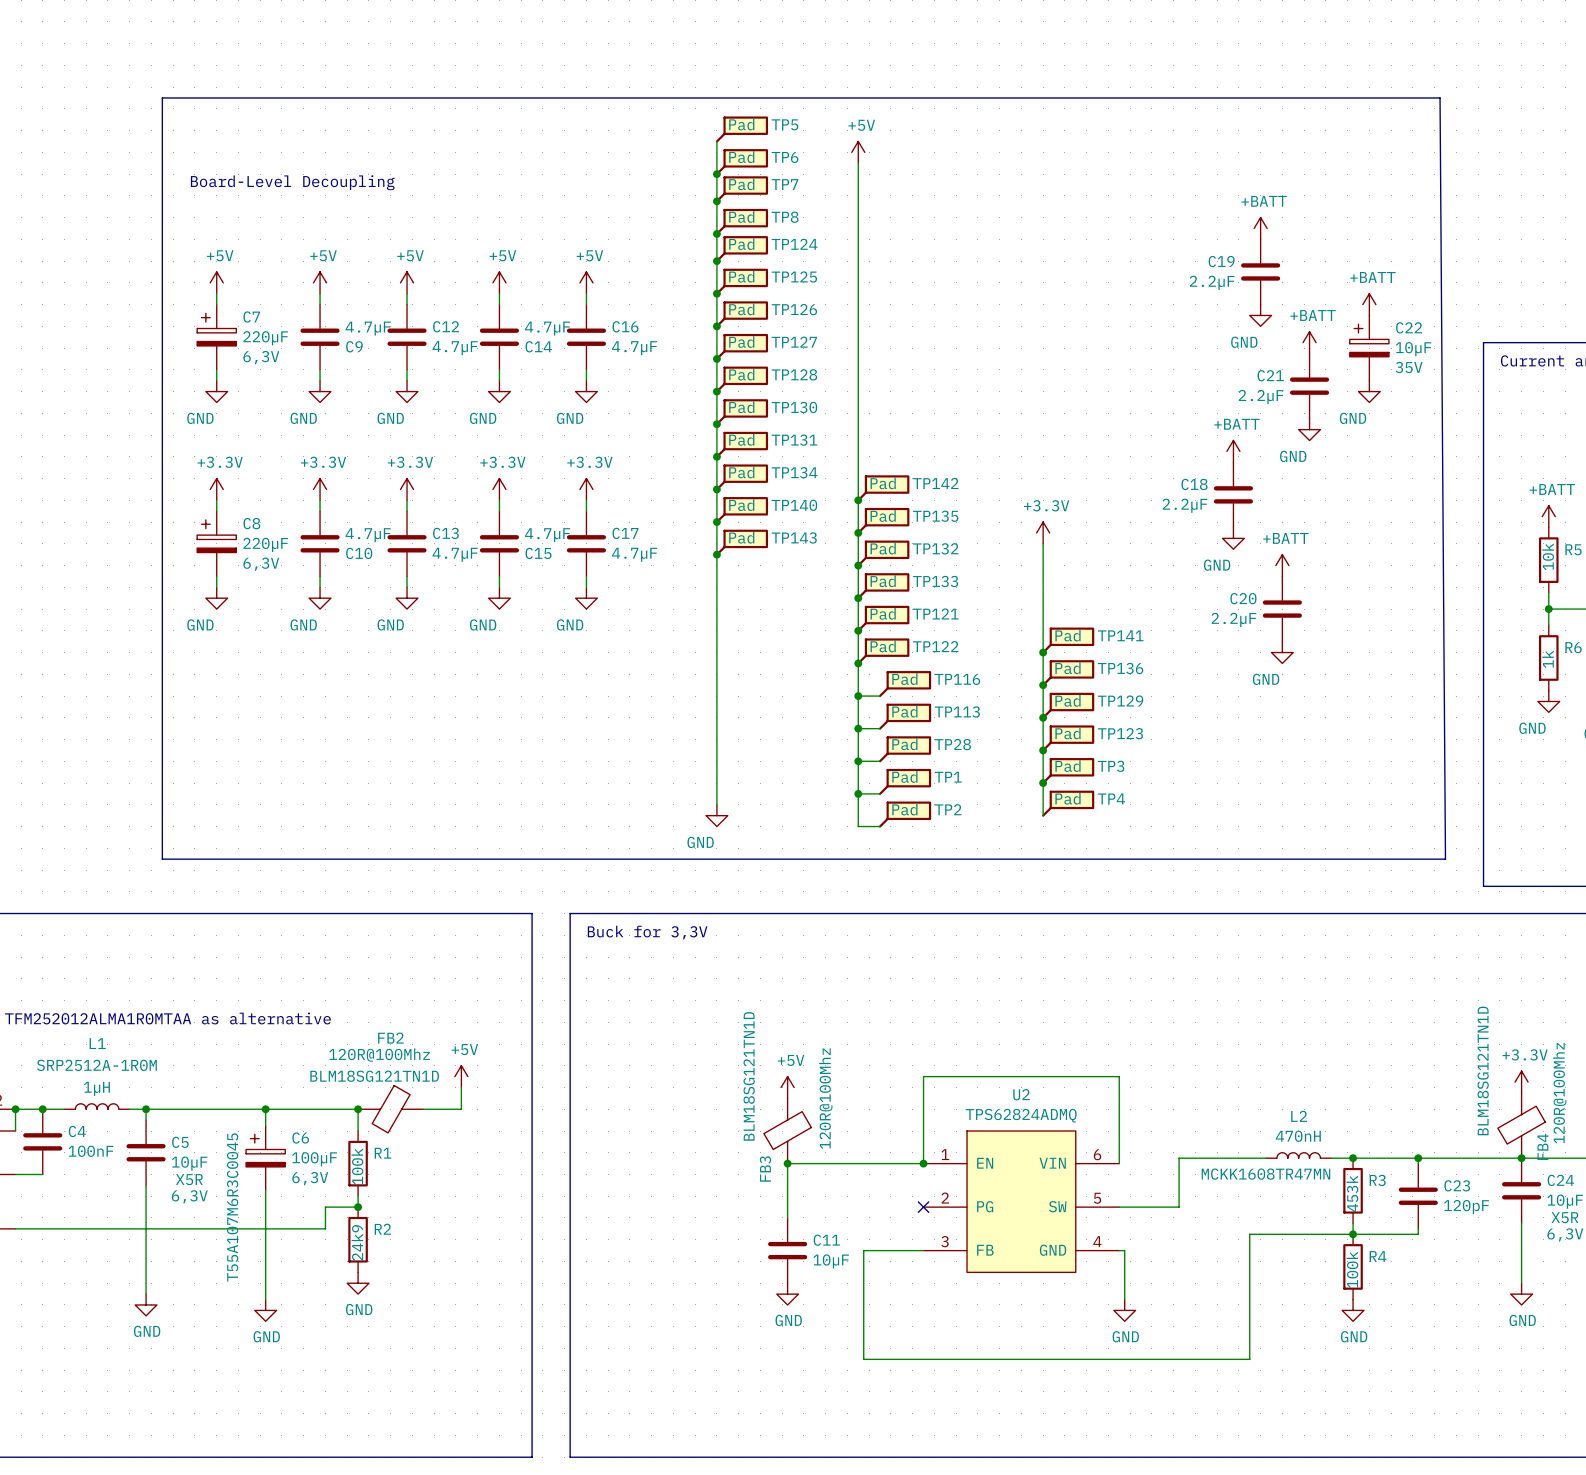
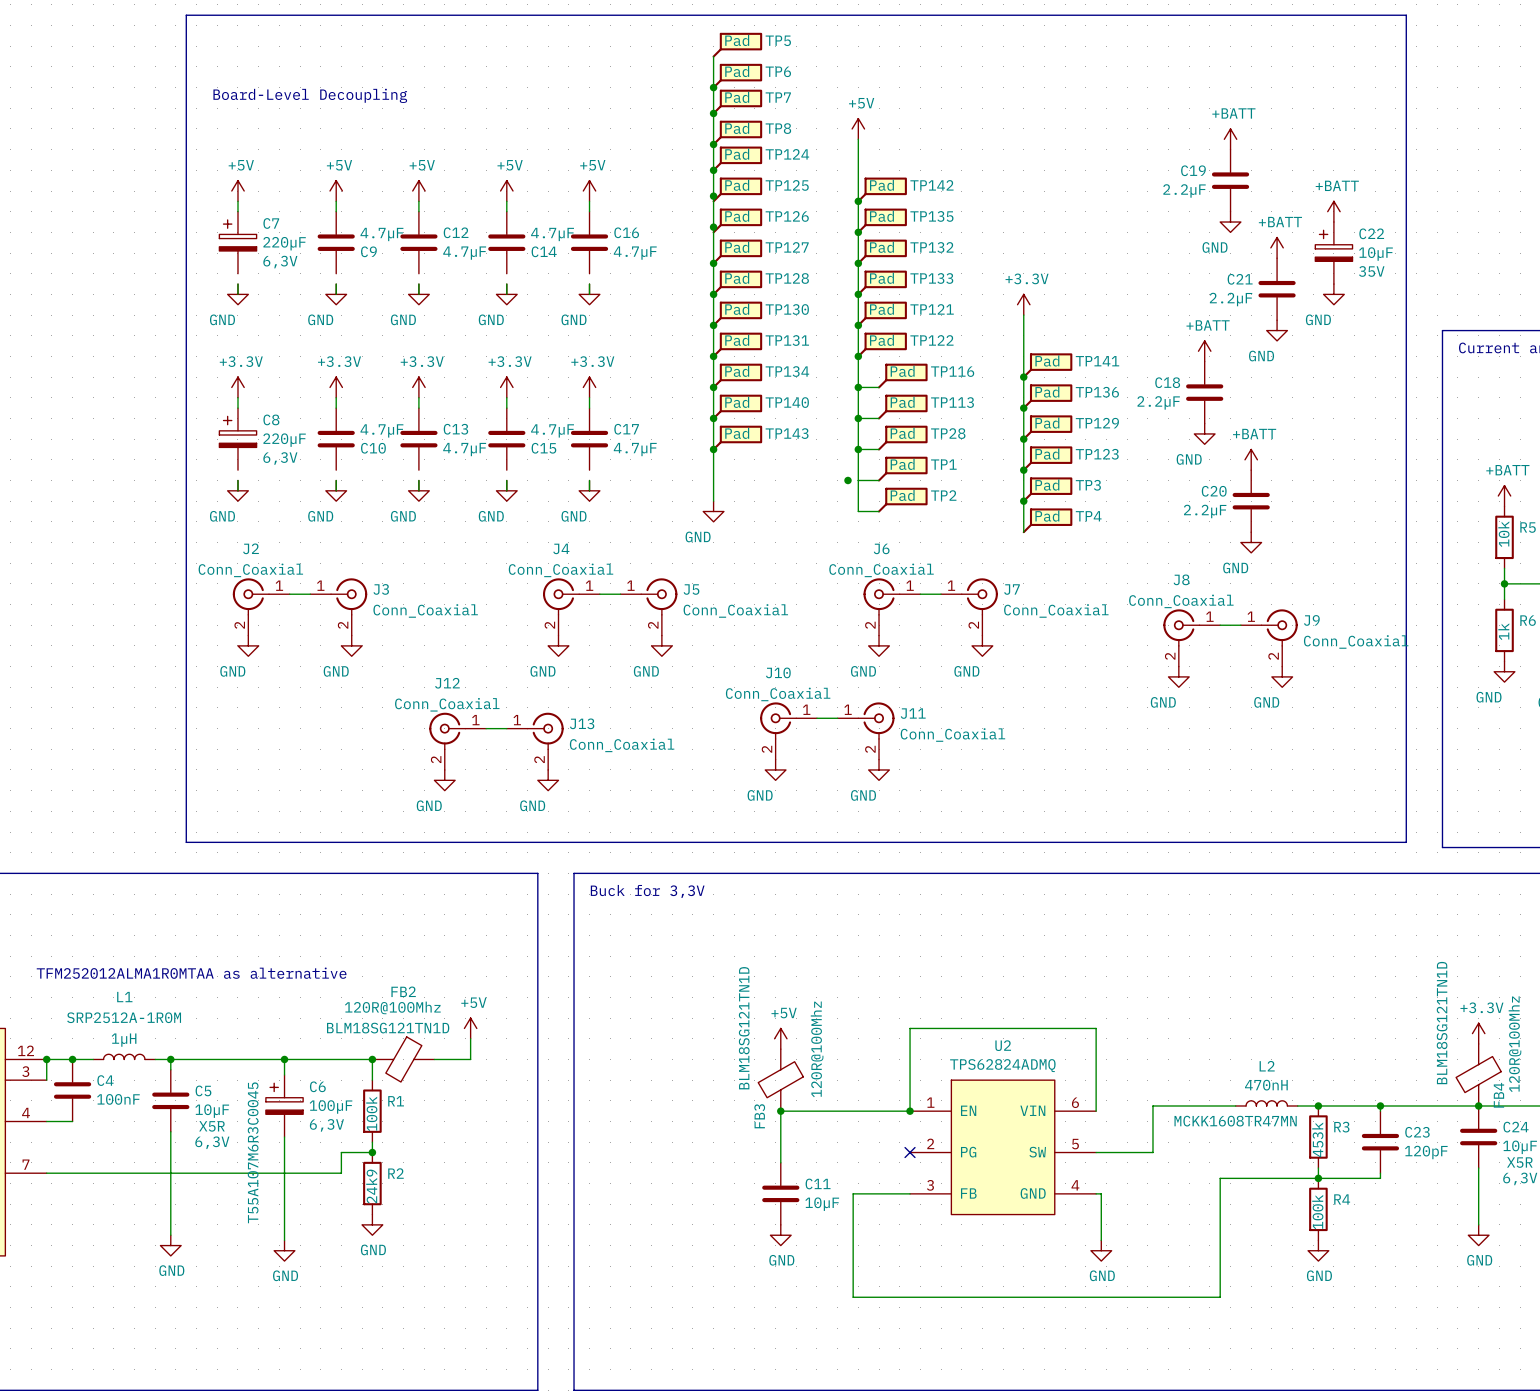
wire: none -> (713, 56) (713, 139)
TP6: none -> Pad (737, 76)
junction: none -> (713, 87)
line: (162, 97) (1440, 97) (1445, 859) (162, 859) -> (186, 97) (186, 15) (1406, 15) (1406, 842) (186, 842) (186, 821)
junction: none -> (713, 113)
TP5 position: (741, 129) -> (737, 45)
wire: none -> (858, 139) (858, 511) (879, 511)
power symbol: none -> +BATT (1230, 139)
junction: none -> (713, 144)
power symbol position: +5V (858, 152) -> +5V (858, 128)
TP6 name: TP6 (785, 157) -> TP124 (787, 154)
wire: (858, 163) (858, 826) (880, 826) -> none
text position: Board-Level Decoupling (292, 182) -> Board-Level Decoupling (310, 95)
TP7 position: (741, 189) -> (737, 102)
power symbol: none -> +5V (237, 191)
power symbol: none -> +5V (336, 191)
power symbol: none -> +5V (418, 191)
power symbol: none -> +5V (506, 191)
power symbol: none -> +5V (589, 191)
junction: none -> (858, 201)
power symbol: none -> +BATT (1333, 211)
TP8 position: (741, 221) -> (737, 133)
power symbol: +BATT (1260, 228) -> GND (1230, 222)
junction: none -> (858, 232)
TP124: Pad (741, 249) -> none
power symbol: none -> +BATT (1277, 247)
junction: (716, 261) -> none
junction: none -> (713, 263)
junction: none -> (858, 263)
C19 position: (1260, 271) -> (1230, 180)
TP125 position: (741, 281) -> (737, 189)
power symbol: +5V (216, 282) -> none
power symbol: +5V (320, 282) -> none
power symbol: +5V (407, 282) -> none
power symbol: +5V (499, 282) -> none
power symbol: +5V (586, 282) -> none
junction: (716, 293) -> none
power symbol: none -> GND (237, 294)
power symbol: none -> GND (336, 294)
power symbol: none -> GND (418, 294)
power symbol: none -> GND (506, 294)
power symbol: none -> GND (589, 294)
junction: none -> (713, 294)
junction: none -> (858, 294)
power symbol: +BATT (1369, 304) -> GND (1333, 294)
TP126 position: (741, 314) -> (737, 220)
power symbol: none -> +3.3V (1023, 304)
power symbol: GND (1260, 315) -> none
junction: (716, 326) -> none
wire: none -> (1023, 315) (1023, 521)
C7 position: (216, 337) -> (237, 242)
C9 position: (320, 337) -> (336, 242)
C12 position: (407, 337) -> (418, 242)
C14 position: (499, 337) -> (506, 242)
C16 position: (586, 337) -> (589, 242)
junction: none -> (713, 325)
junction: none -> (858, 325)
power symbol: +BATT (1309, 342) -> GND (1277, 330)
TP127 position: (741, 347) -> (737, 252)
C22 position: (1369, 348) -> (1333, 253)
junction: (716, 358) -> none
power symbol: none -> +BATT (1204, 351)
wire: (216, 369) (216, 380) -> (237, 201) (237, 211)
wire: (320, 369) (320, 380) -> (336, 201) (336, 211)
wire: (407, 369) (407, 380) -> (418, 201) (418, 211)
wire: (499, 369) (499, 380) -> (506, 201) (506, 211)
wire: (586, 369) (586, 380) -> (589, 201) (589, 211)
junction: none -> (713, 356)
junction: none -> (858, 356)
TP128 position: (741, 379) -> (737, 283)
C21 position: (1309, 386) -> (1277, 289)
power symbol: GND (216, 391) -> none
power symbol: GND (320, 391) -> none
power symbol: GND (407, 391) -> none
power symbol: GND (499, 391) -> none
power symbol: GND (586, 391) -> none
junction: (716, 391) -> none
junction: none -> (1023, 377)
power symbol: GND (1369, 391) -> none
power symbol: none -> +3.3V (237, 387)
power symbol: none -> +3.3V (336, 387)
power symbol: none -> +3.3V (418, 387)
power symbol: none -> +3.3V (506, 387)
power symbol: none -> +3.3V (589, 387)
junction: none -> (713, 387)
wire: none -> (858, 387) (879, 387)
junction: none -> (858, 387)
TP130 position: (741, 412) -> (737, 314)
junction: (716, 424) -> none
junction: none -> (1023, 408)
power symbol: GND (1309, 429) -> none
junction: none -> (713, 418)
wire: none -> (858, 418) (879, 418)
junction: none -> (858, 418)
TP131 position: (741, 444) -> (737, 345)
power symbol: +BATT (1233, 451) -> GND (1204, 433)
junction: (716, 456) -> none
junction: none -> (1023, 439)
junction: none -> (713, 449)
wire: none -> (858, 449) (879, 449)
junction: none -> (858, 449)
TP134 position: (741, 477) -> (737, 376)
power symbol: none -> +BATT (1251, 459)
TP142 position: (883, 488) -> (882, 189)
power symbol: +3.3V (216, 489) -> none
power symbol: +3.3V (320, 489) -> none
power symbol: +3.3V (407, 489) -> none
power symbol: +3.3V (499, 489) -> none
power symbol: +3.3V (586, 489) -> none
junction: (716, 489) -> none
junction: none -> (1023, 470)
C18 position: (1233, 494) -> (1204, 392)
wire: none -> (858, 480) (879, 480)
TP140 position: (741, 510) -> (737, 407)
power symbol: none -> GND (237, 490)
power symbol: none -> GND (336, 490)
power symbol: none -> GND (418, 490)
power symbol: none -> GND (506, 490)
power symbol: none -> GND (589, 490)
TP135 position: (883, 520) -> (882, 220)
wire: (716, 522) (716, 804) -> none
junction: (716, 522) -> none
junction: none -> (1023, 501)
power symbol: none -> GND (713, 511)
junction: (858, 532) -> none
power symbol: +3.3V (1043, 532) -> none
power symbol: GND (1233, 538) -> none
TP143 position: (741, 542) -> (737, 438)
C8 position: (216, 543) -> (237, 439)
C10 position: (320, 543) -> (336, 439)
C13 position: (407, 543) -> (418, 439)
C15 position: (499, 543) -> (506, 439)
C17 position: (586, 543) -> (589, 439)
TP132 position: (883, 553) -> (882, 252)
junction: (716, 554) -> none
wire: (1043, 554) (1043, 815) -> none
junction: (858, 565) -> none
power symbol: +BATT (1282, 565) -> GND (1251, 542)
wire: (216, 576) (216, 587) -> (237, 397) (237, 408)
wire: (320, 576) (320, 587) -> (336, 397) (336, 408)
wire: (407, 576) (407, 587) -> (418, 397) (418, 408)
wire: (499, 576) (499, 587) -> (506, 397) (506, 408)
wire: (586, 576) (586, 587) -> (589, 397) (589, 408)
TP133 position: (883, 586) -> (882, 283)
power symbol: GND (216, 598) -> none
power symbol: GND (320, 598) -> none
power symbol: GND (407, 598) -> none
power symbol: GND (499, 598) -> none
power symbol: GND (586, 598) -> none
junction: (858, 598) -> none
C20 position: (1282, 609) -> (1251, 501)
TP121 position: (883, 618) -> (882, 314)
wire: none -> (289, 594) (310, 594)
wire: none -> (599, 594) (620, 594)
junction: (858, 630) -> none
J2: none -> Conn_Coaxial (261, 606)
J3: none -> Conn_Coaxial (338, 606)
J4: none -> Conn_Coaxial (571, 606)
J5: none -> Conn_Coaxial (648, 606)
J6: none -> Conn_Coaxial (891, 606)
J7: none -> Conn_Coaxial (969, 606)
TP141 position: (1068, 640) -> (1047, 365)
TP122 position: (883, 651) -> (882, 345)
junction: (1043, 652) -> none
wire: none -> (1220, 625) (1240, 625)
power symbol: GND (1282, 652) -> none
junction: (858, 663) -> none
J8: none -> Conn_Coaxial (1191, 637)
J9: none -> Conn_Coaxial (1269, 637)
TP136 position: (1068, 673) -> (1047, 396)
power symbol: none -> GND (248, 645)
power symbol: none -> GND (351, 645)
power symbol: none -> GND (558, 645)
power symbol: none -> GND (661, 645)
power symbol: none -> GND (879, 645)
power symbol: none -> GND (982, 645)
TP116 position: (905, 684) -> (902, 376)
junction: (1043, 685) -> none
wire: (858, 696) (880, 696) -> (920, 594) (941, 594)
junction: (858, 696) -> none
TP129 position: (1068, 705) -> (1047, 427)
power symbol: none -> GND (1178, 676)
power symbol: none -> GND (1282, 676)
TP113 position: (905, 716) -> (902, 407)
junction: (1043, 717) -> none
wire: (858, 728) (880, 728) -> none
junction: (858, 728) -> none
TP123 position: (1068, 738) -> (1047, 458)
TP28 position: (905, 749) -> (902, 438)
junction: (1043, 750) -> none
wire: none -> (486, 728) (506, 728)
wire: (858, 761) (880, 761) -> (816, 718) (837, 718)
junction: (858, 761) -> none
J10: none -> Conn_Coaxial (788, 731)
J11: none -> Conn_Coaxial (866, 731)
TP3 position: (1068, 771) -> (1047, 489)
J12: none -> Conn_Coaxial (457, 741)
J13: none -> Conn_Coaxial (535, 741)
TP1 position: (905, 781) -> (902, 469)
junction: (1043, 783) -> none
wire: (858, 793) (880, 793) -> none
junction: (858, 793) -> none
TP4 position: (1068, 803) -> (1047, 520)
power symbol: none -> GND (879, 769)
TP2 position: (905, 814) -> (902, 500)
power symbol: none -> GND (444, 780)
power symbol: none -> GND (548, 780)
power symbol position: GND (716, 815) -> GND (775, 769)

